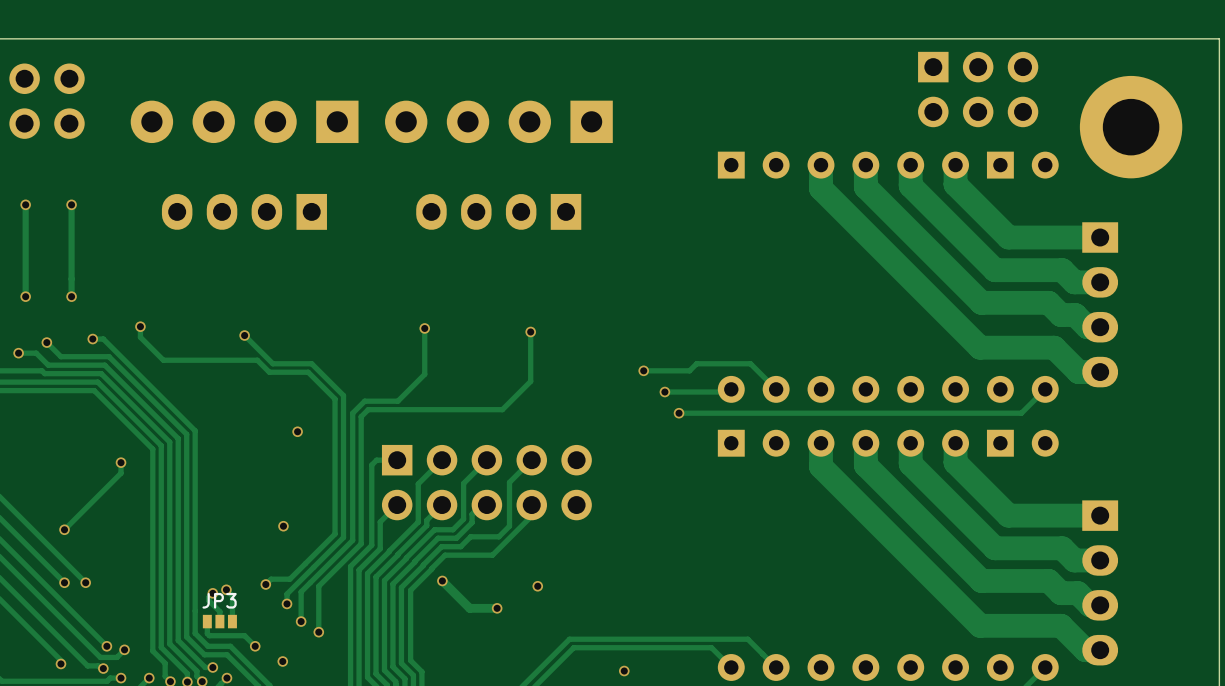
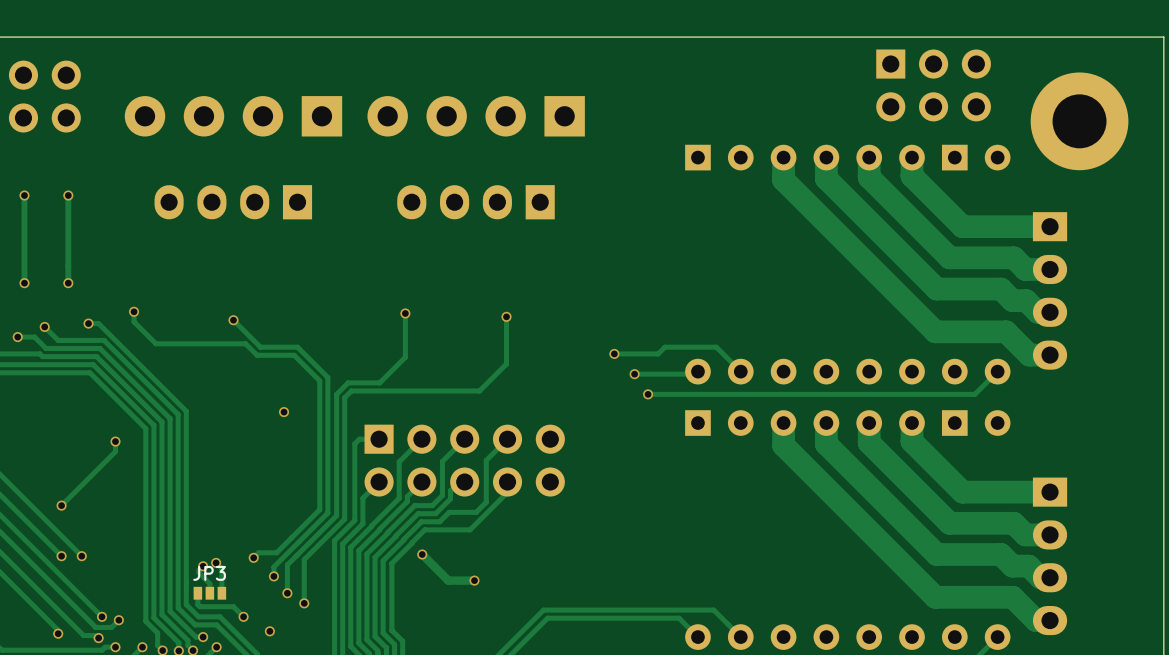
via: (283, 526) -> none
via: (537, 586) -> none
via: (624, 671) -> none

